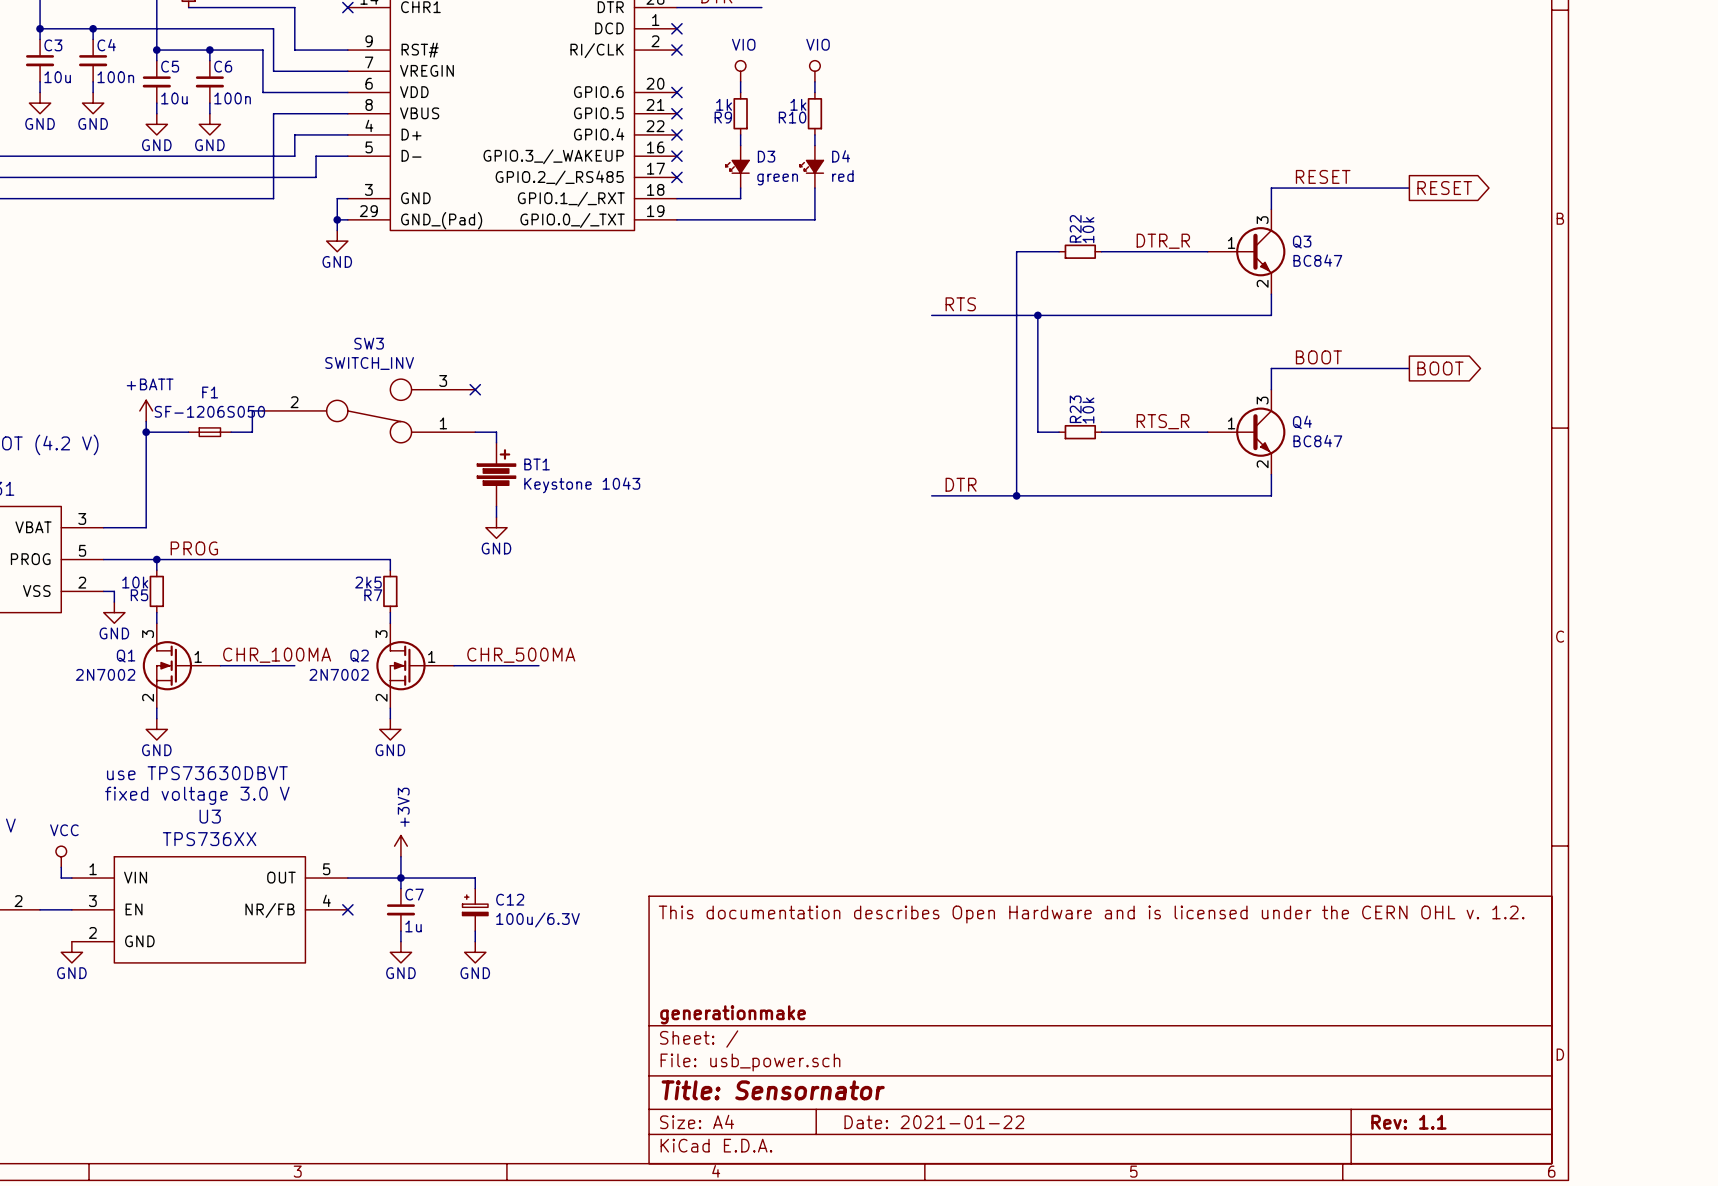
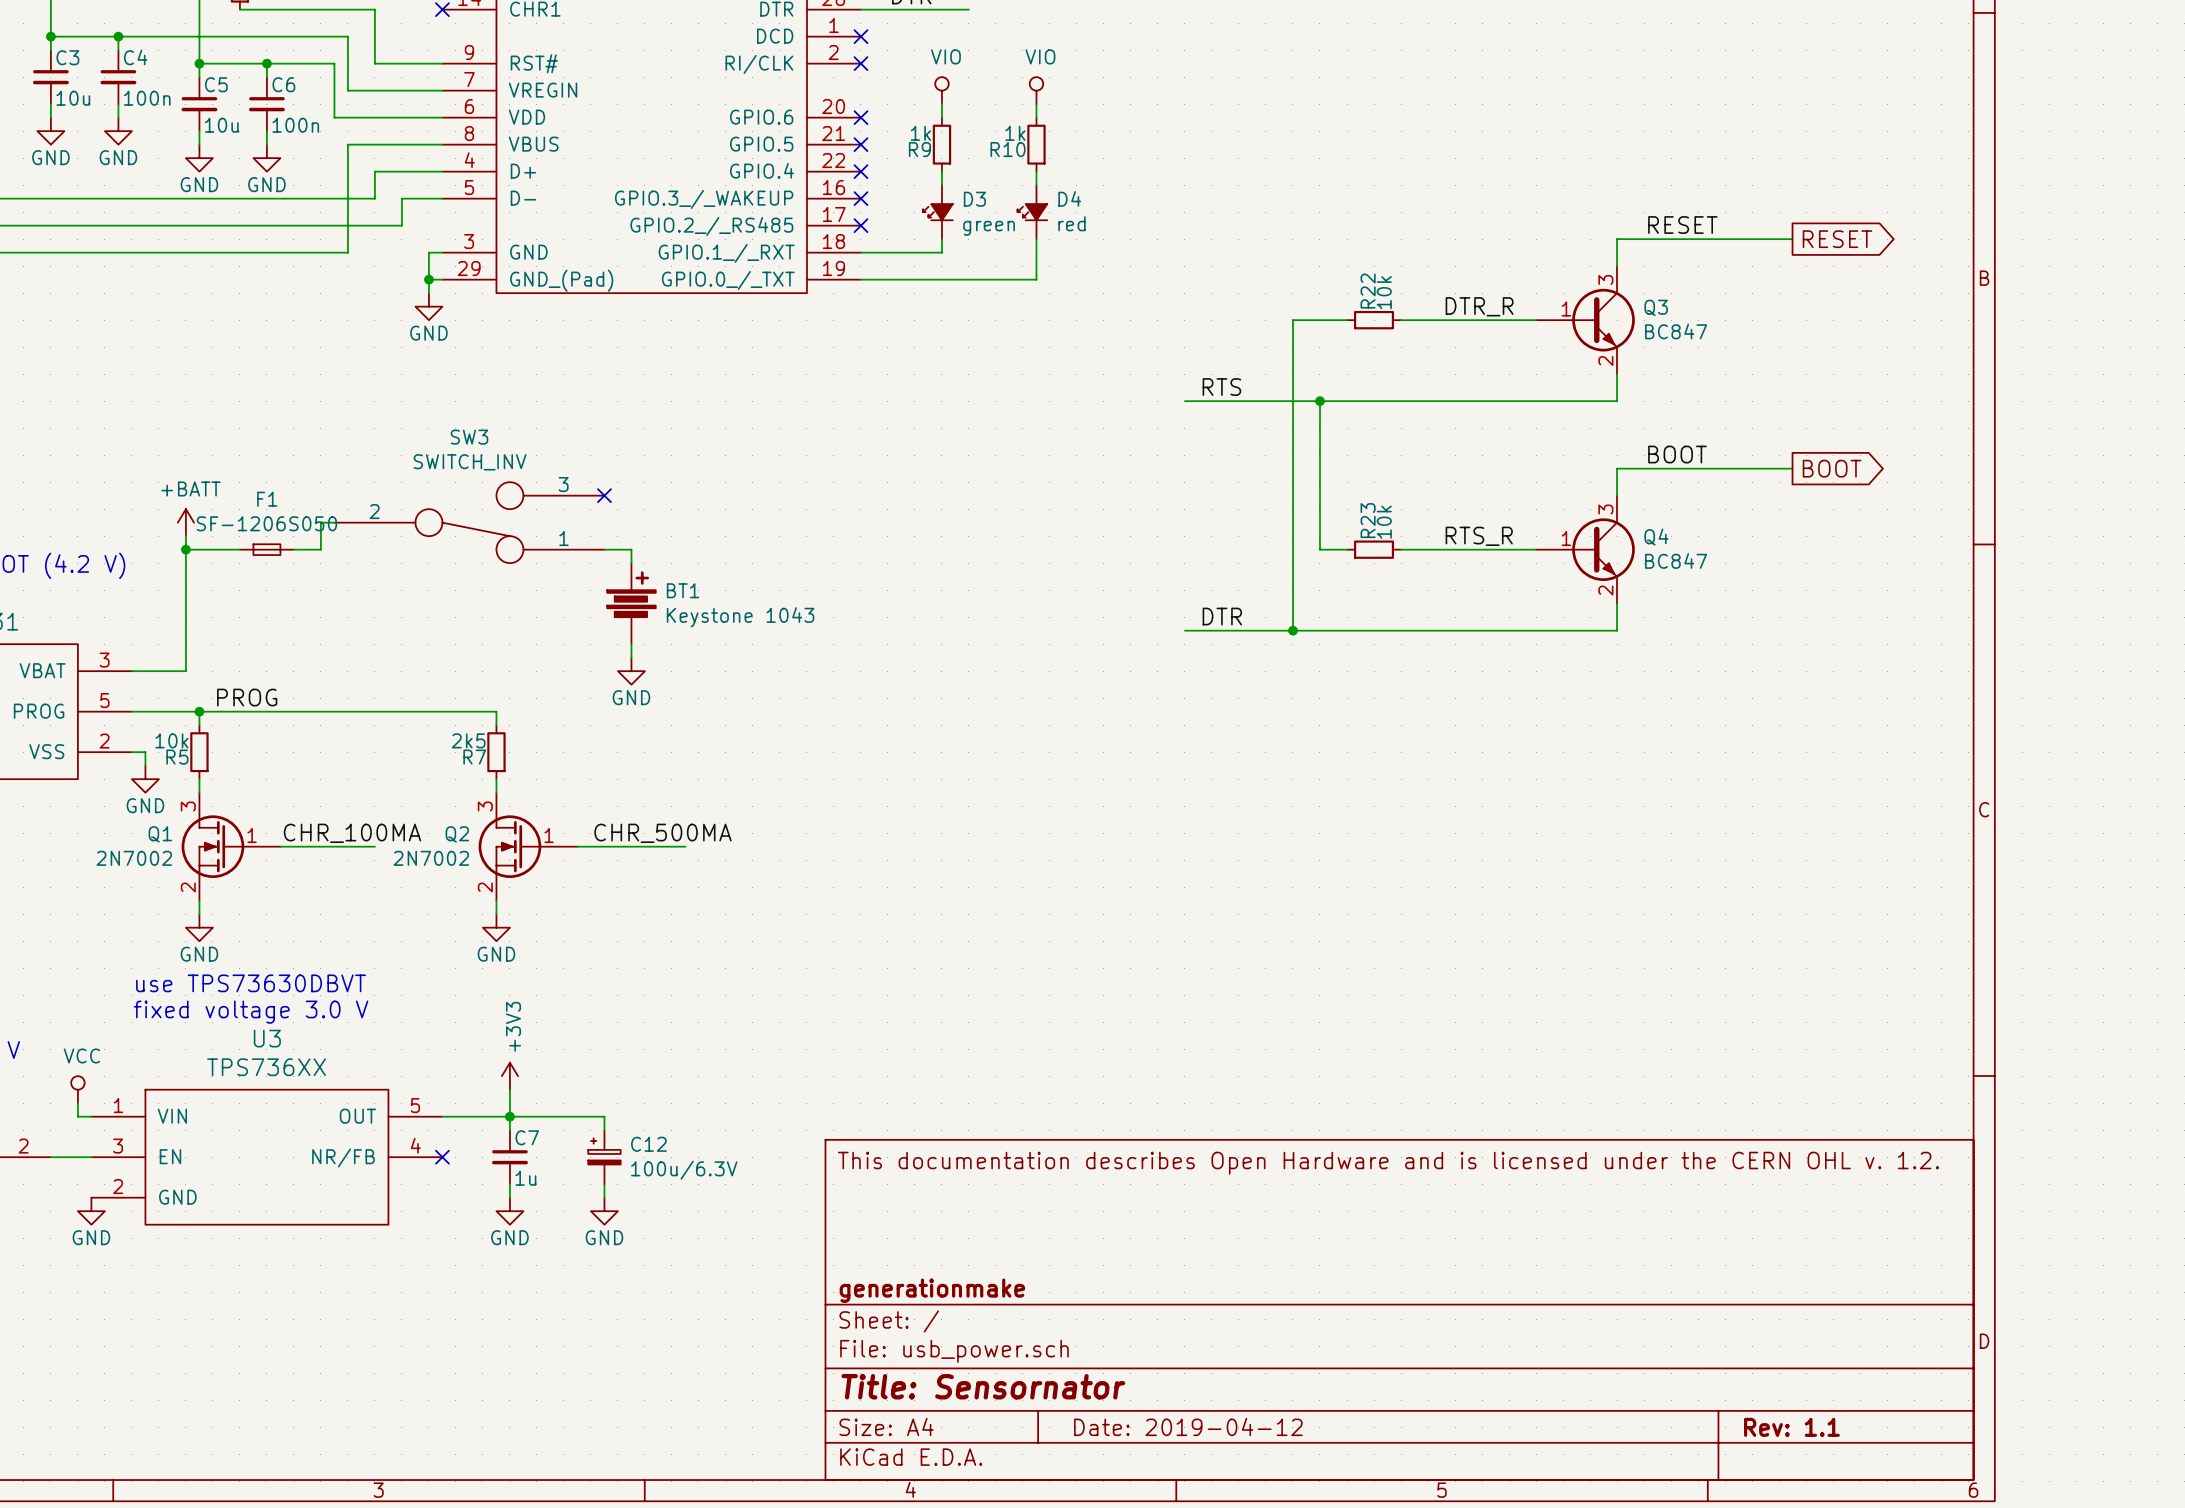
title block: Date: 2021-01-22 (934, 1122) -> Date: 2019-04-12 (1188, 1426)

